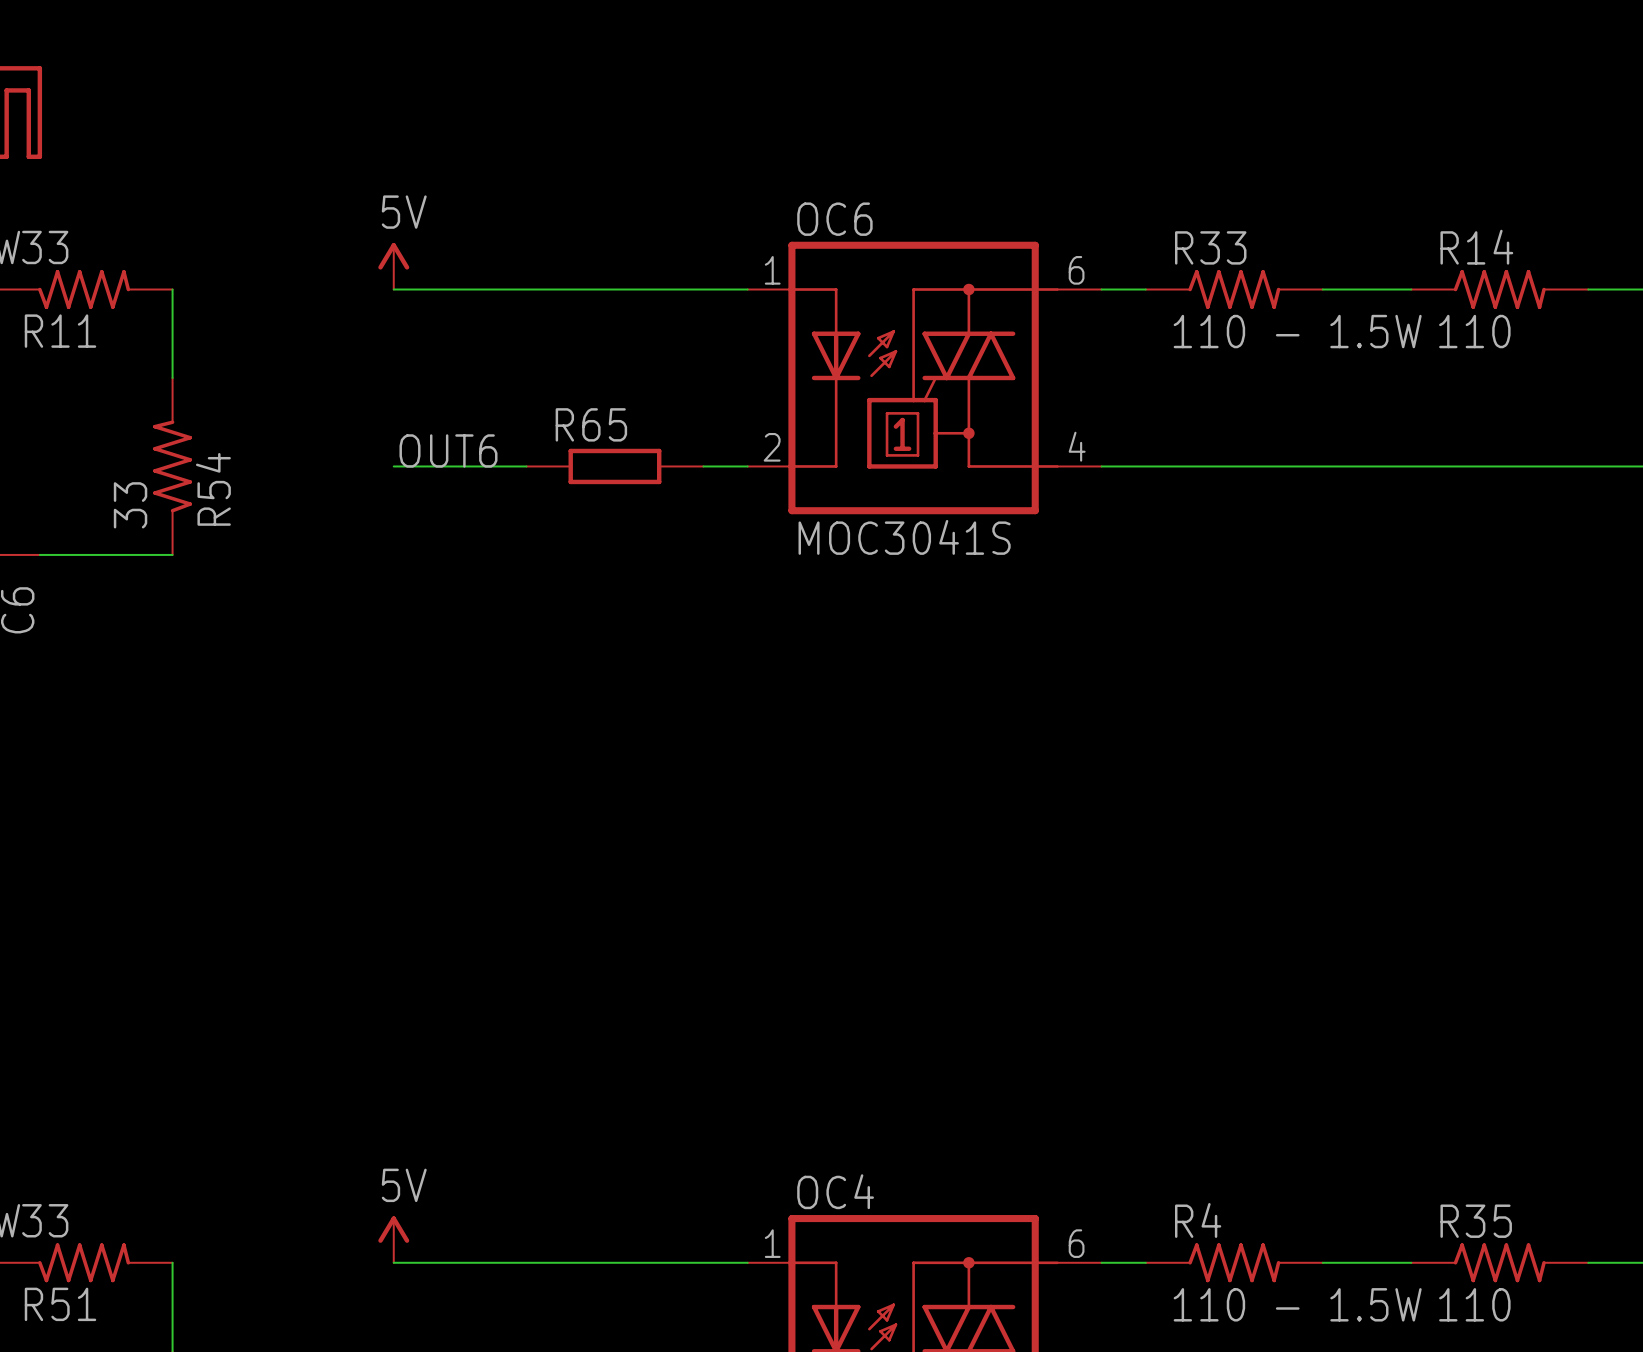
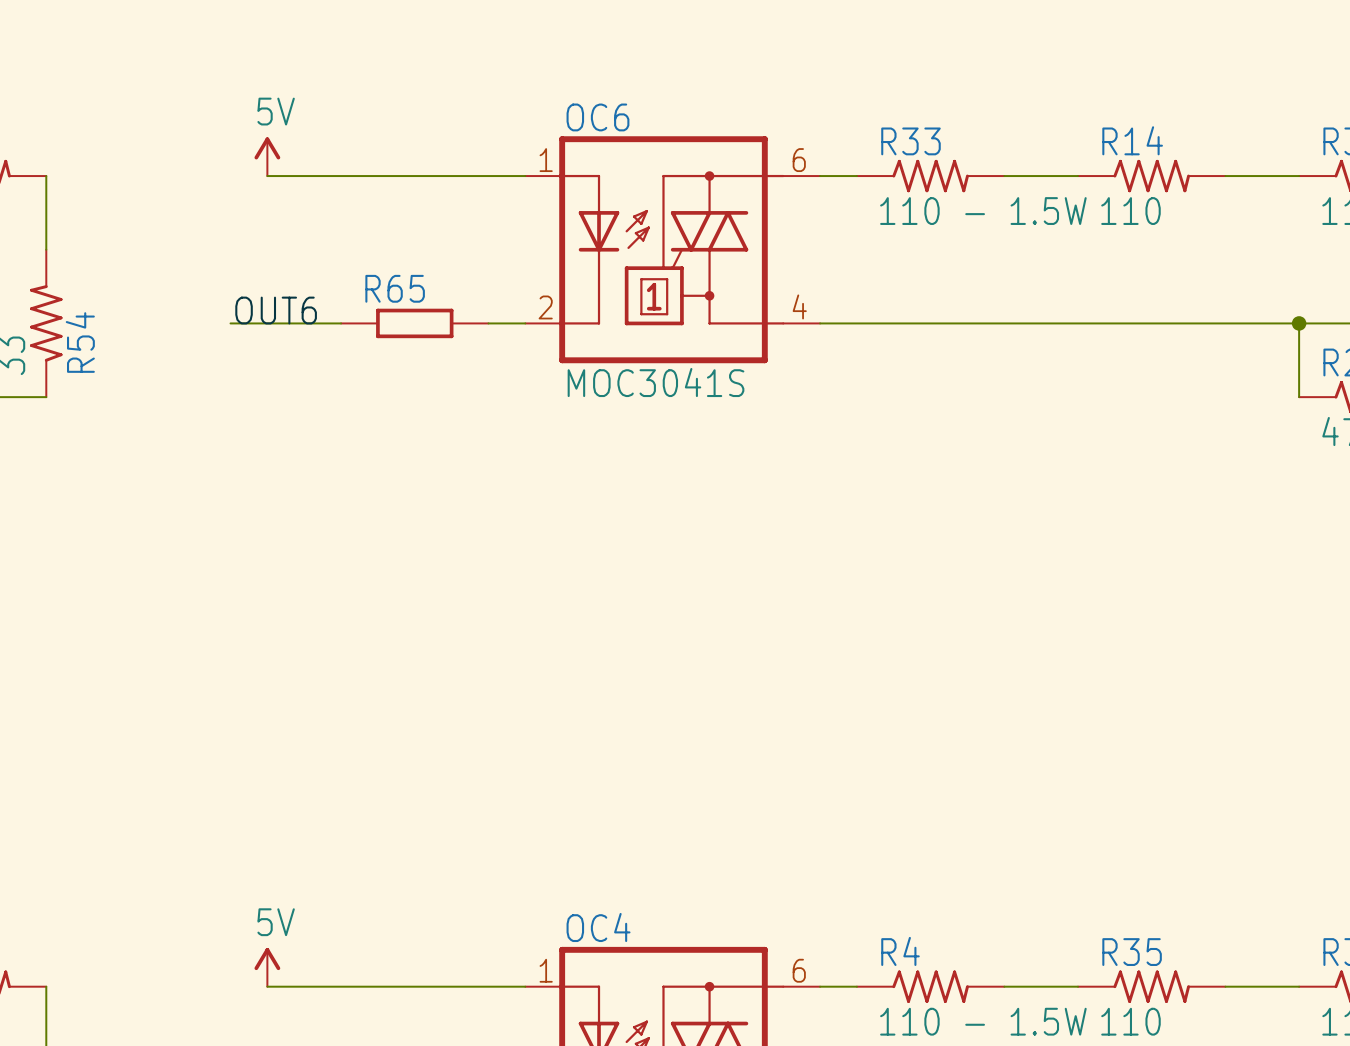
power symbol position: 5V (393, 266) -> 5V (267, 156)
wire: (393, 289) (438, 289) -> none
power symbol position: 5V (393, 1239) -> 5V (267, 967)
wire: (393, 1262) (438, 1262) -> none

